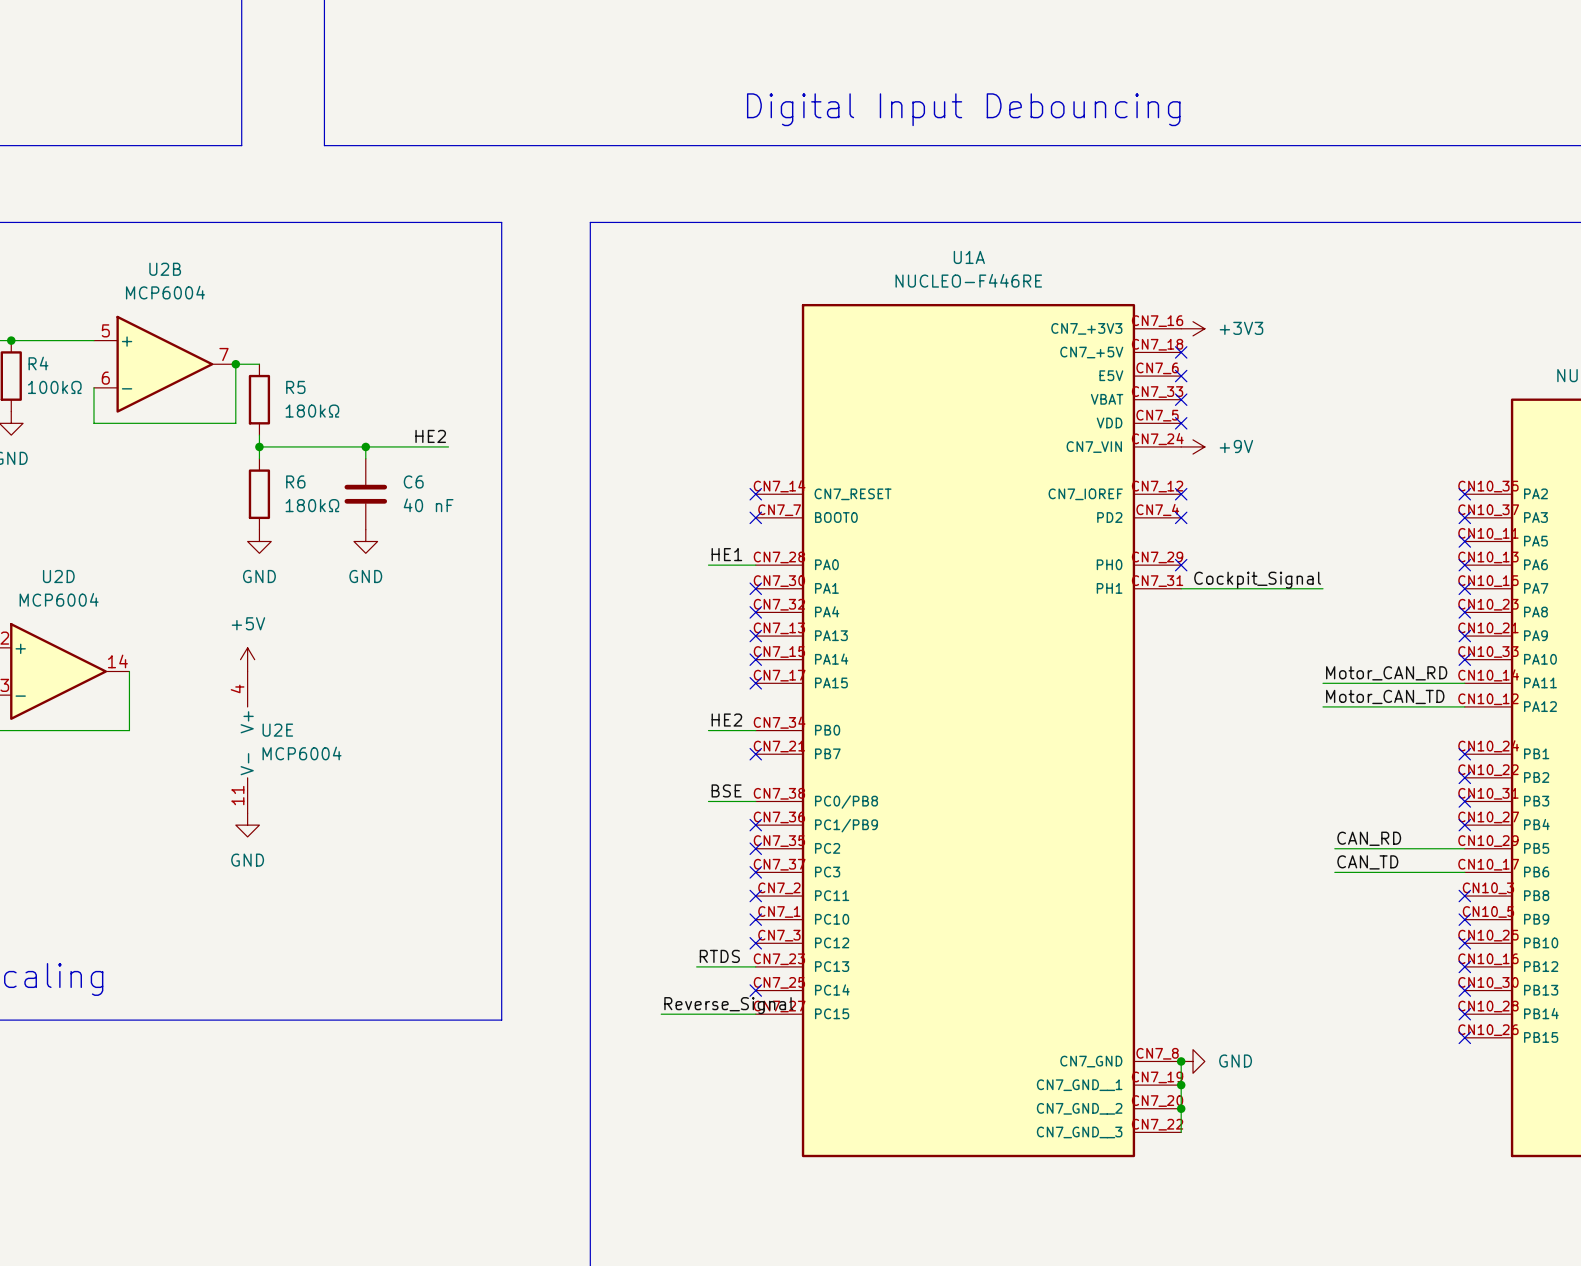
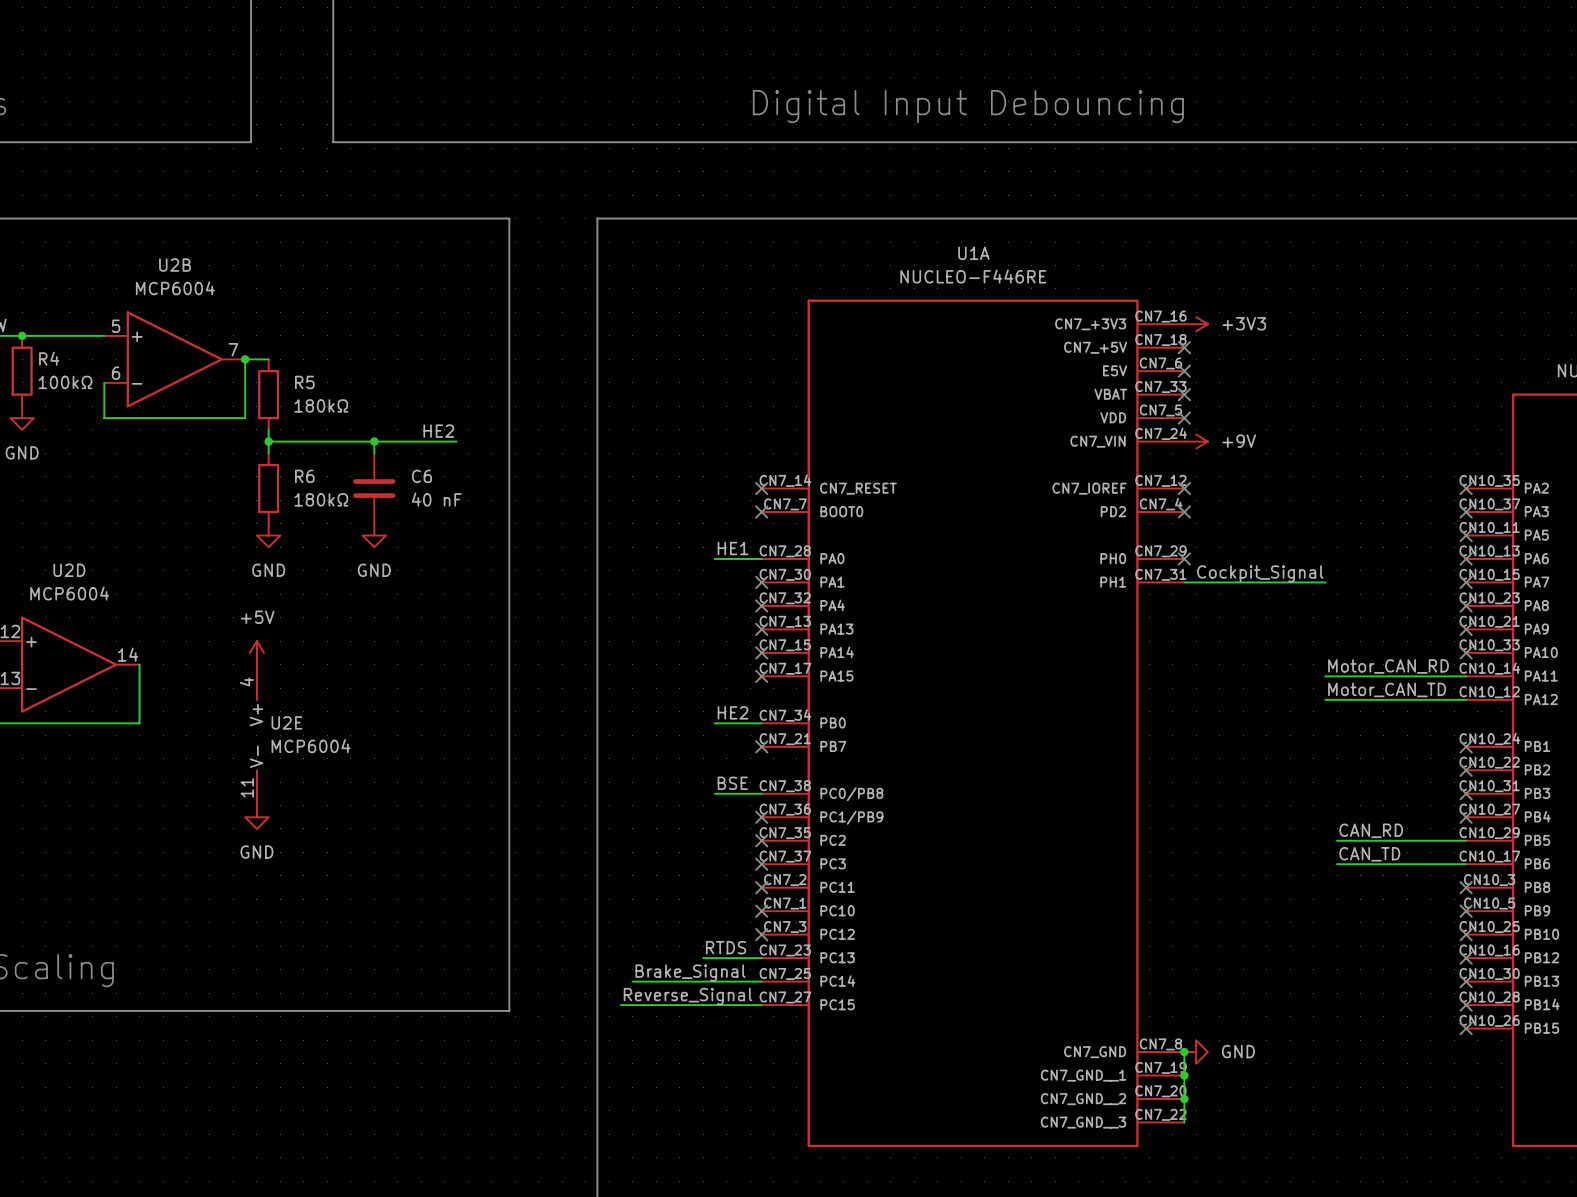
label: none -> Brake_Signal (690, 973)
wire: none -> (632, 981) (761, 981)
no-connect mark: (755, 990) -> none
label position: Reverse_Signal (728, 1005) -> Reverse_Signal (688, 996)
wire: none -> (620, 1005) (667, 1005)

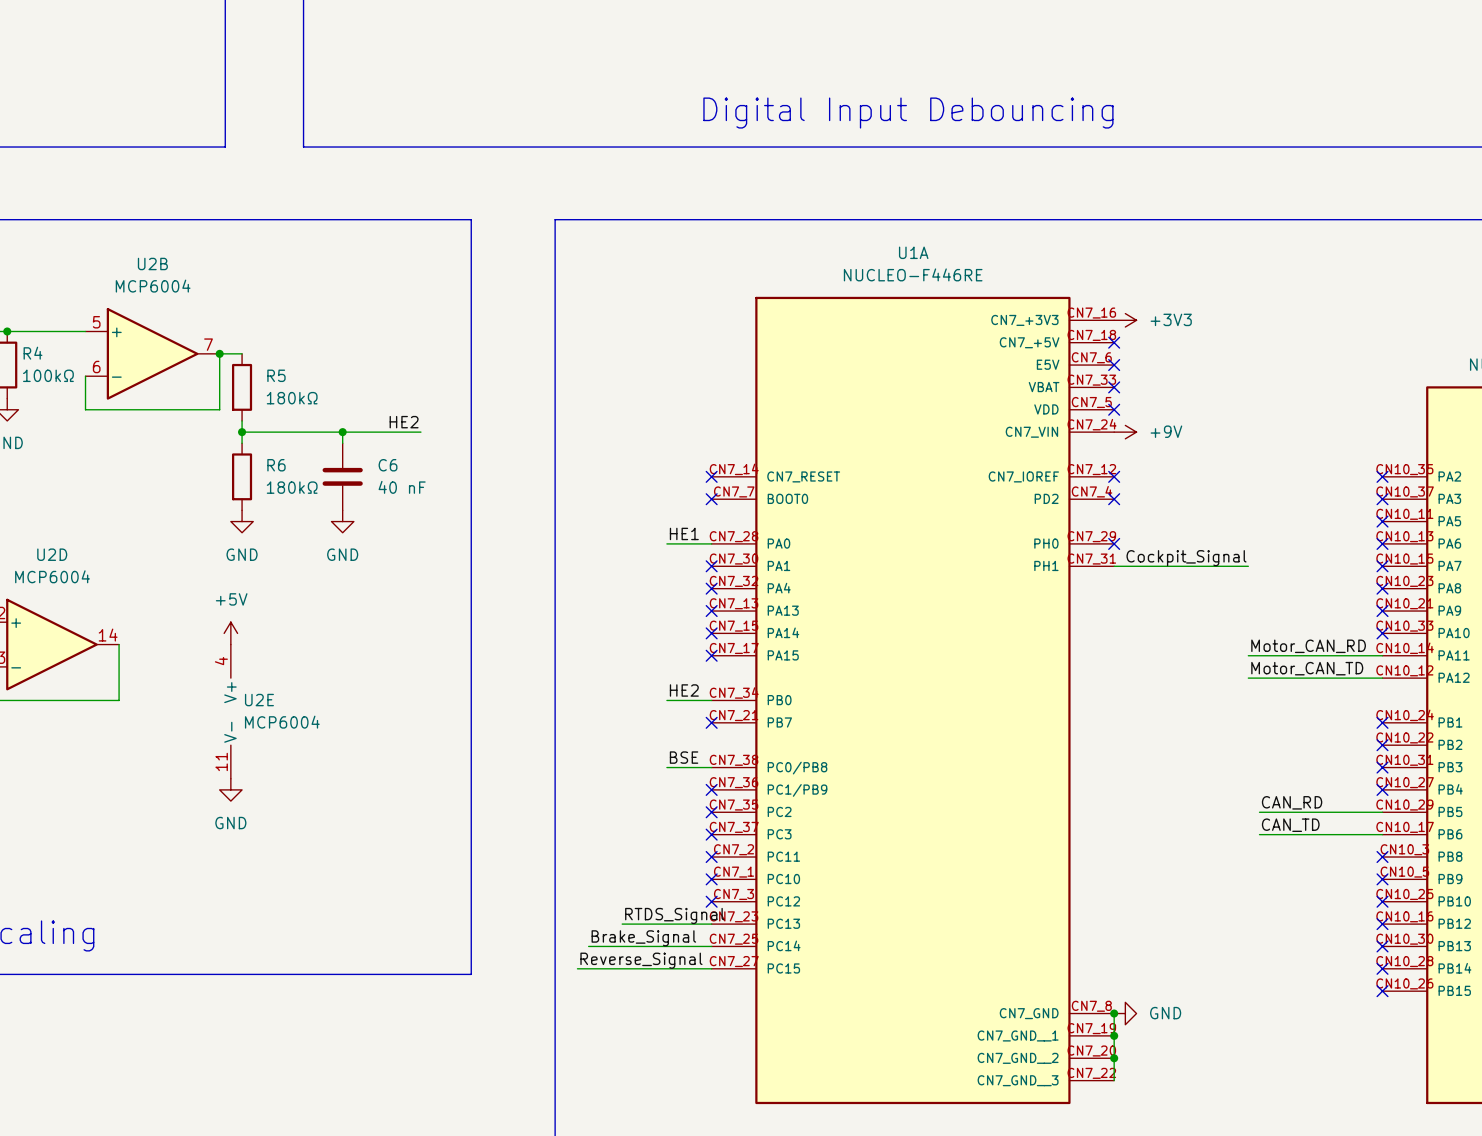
label: RTDS (726, 947) -> none
label: none -> RTDS_Signal (674, 915)
wire: none -> (622, 924) (655, 924)

